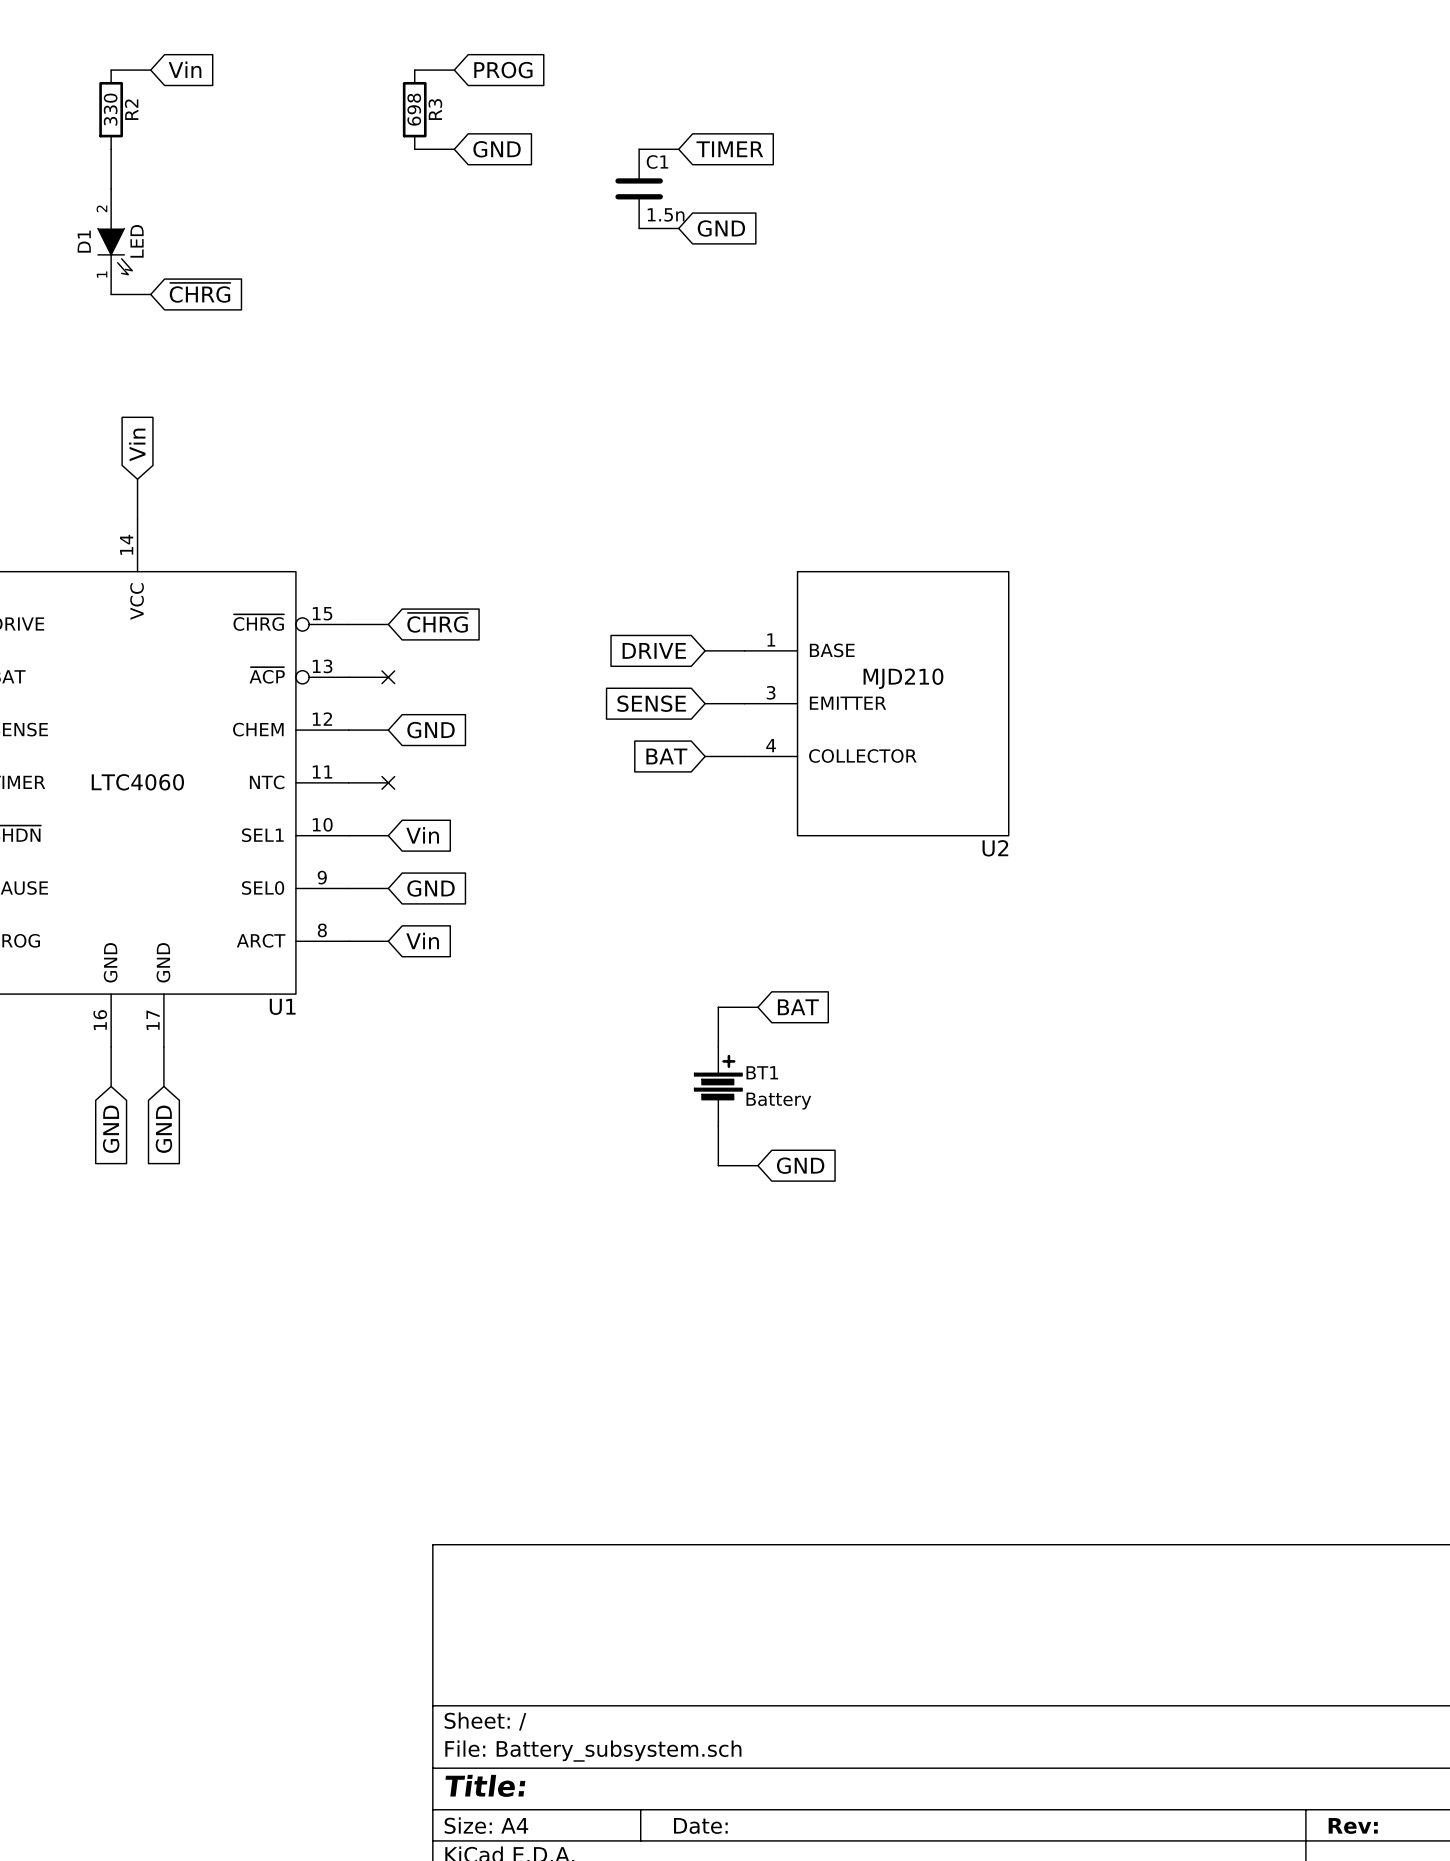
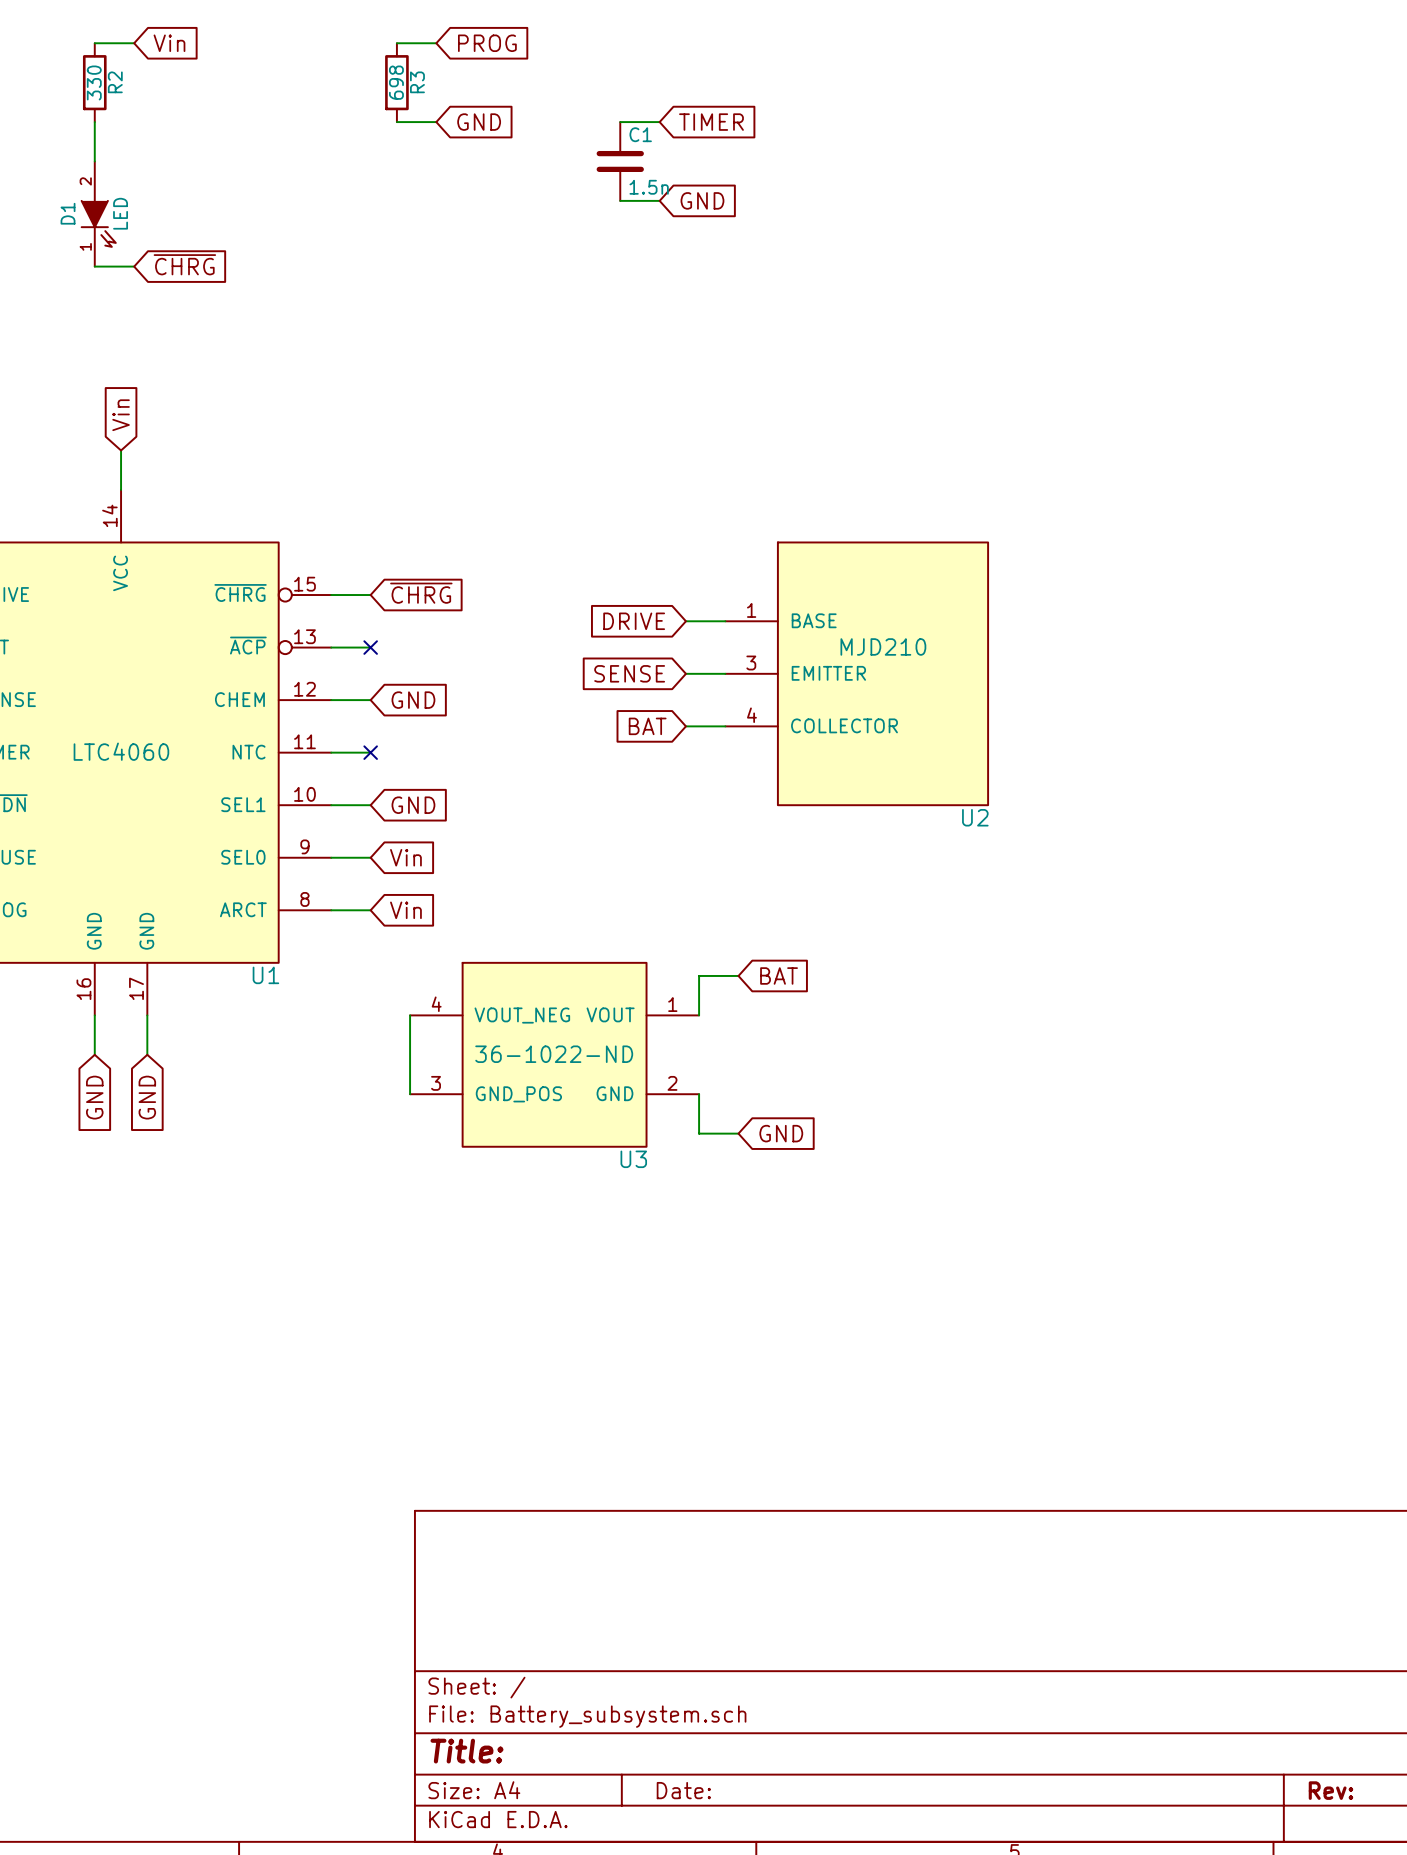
global label: Vin (422, 835) -> GND (413, 805)
global label: GND (431, 888) -> Vin (405, 857)
wire: none -> (410, 1015) (410, 1094)
U3: none -> 36-1022-ND (554, 1054)
BT1: Battery (718, 1086) -> none

